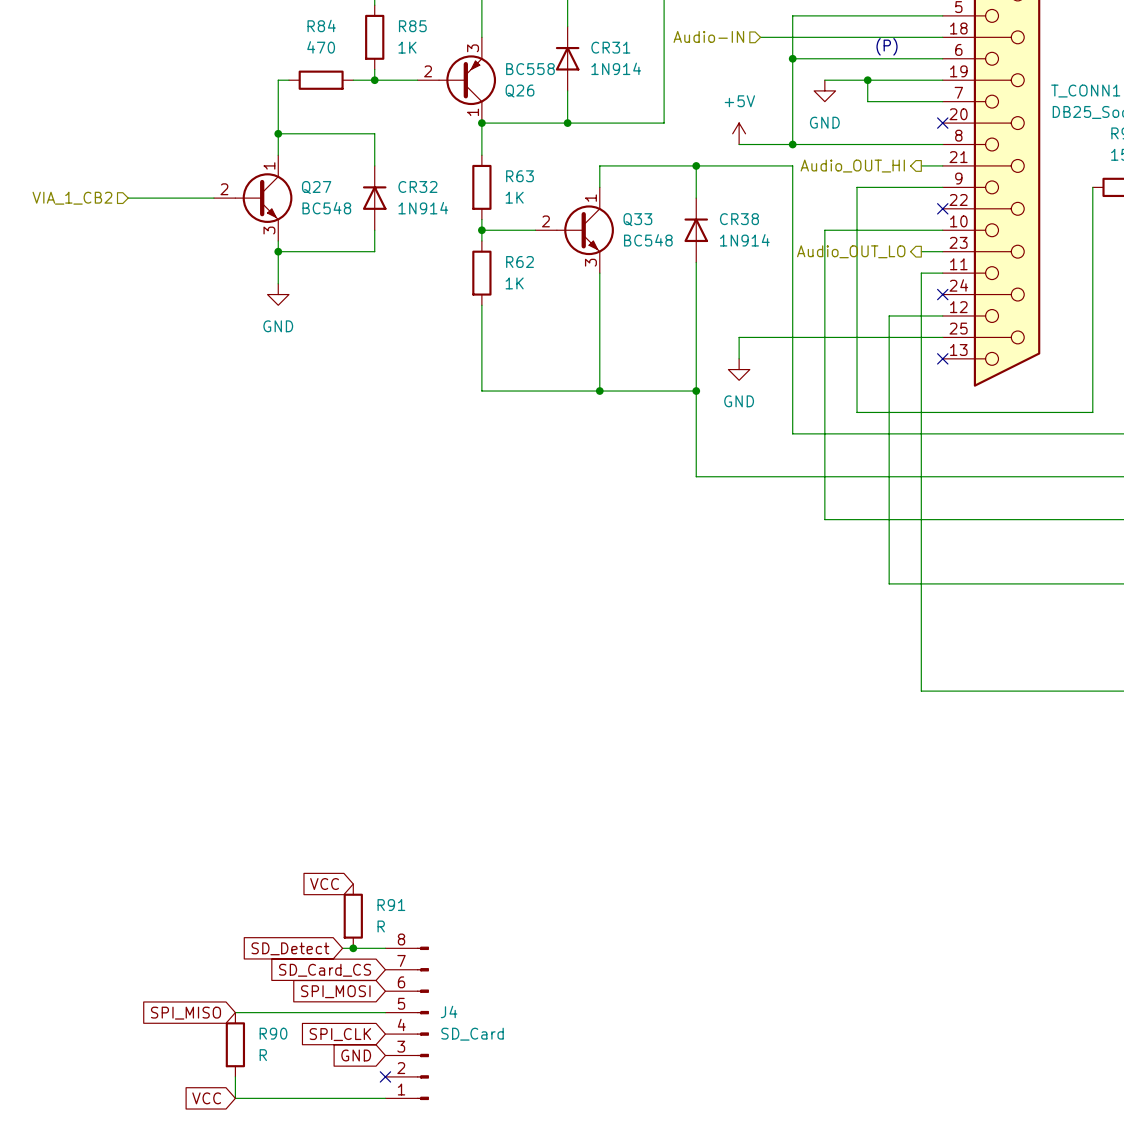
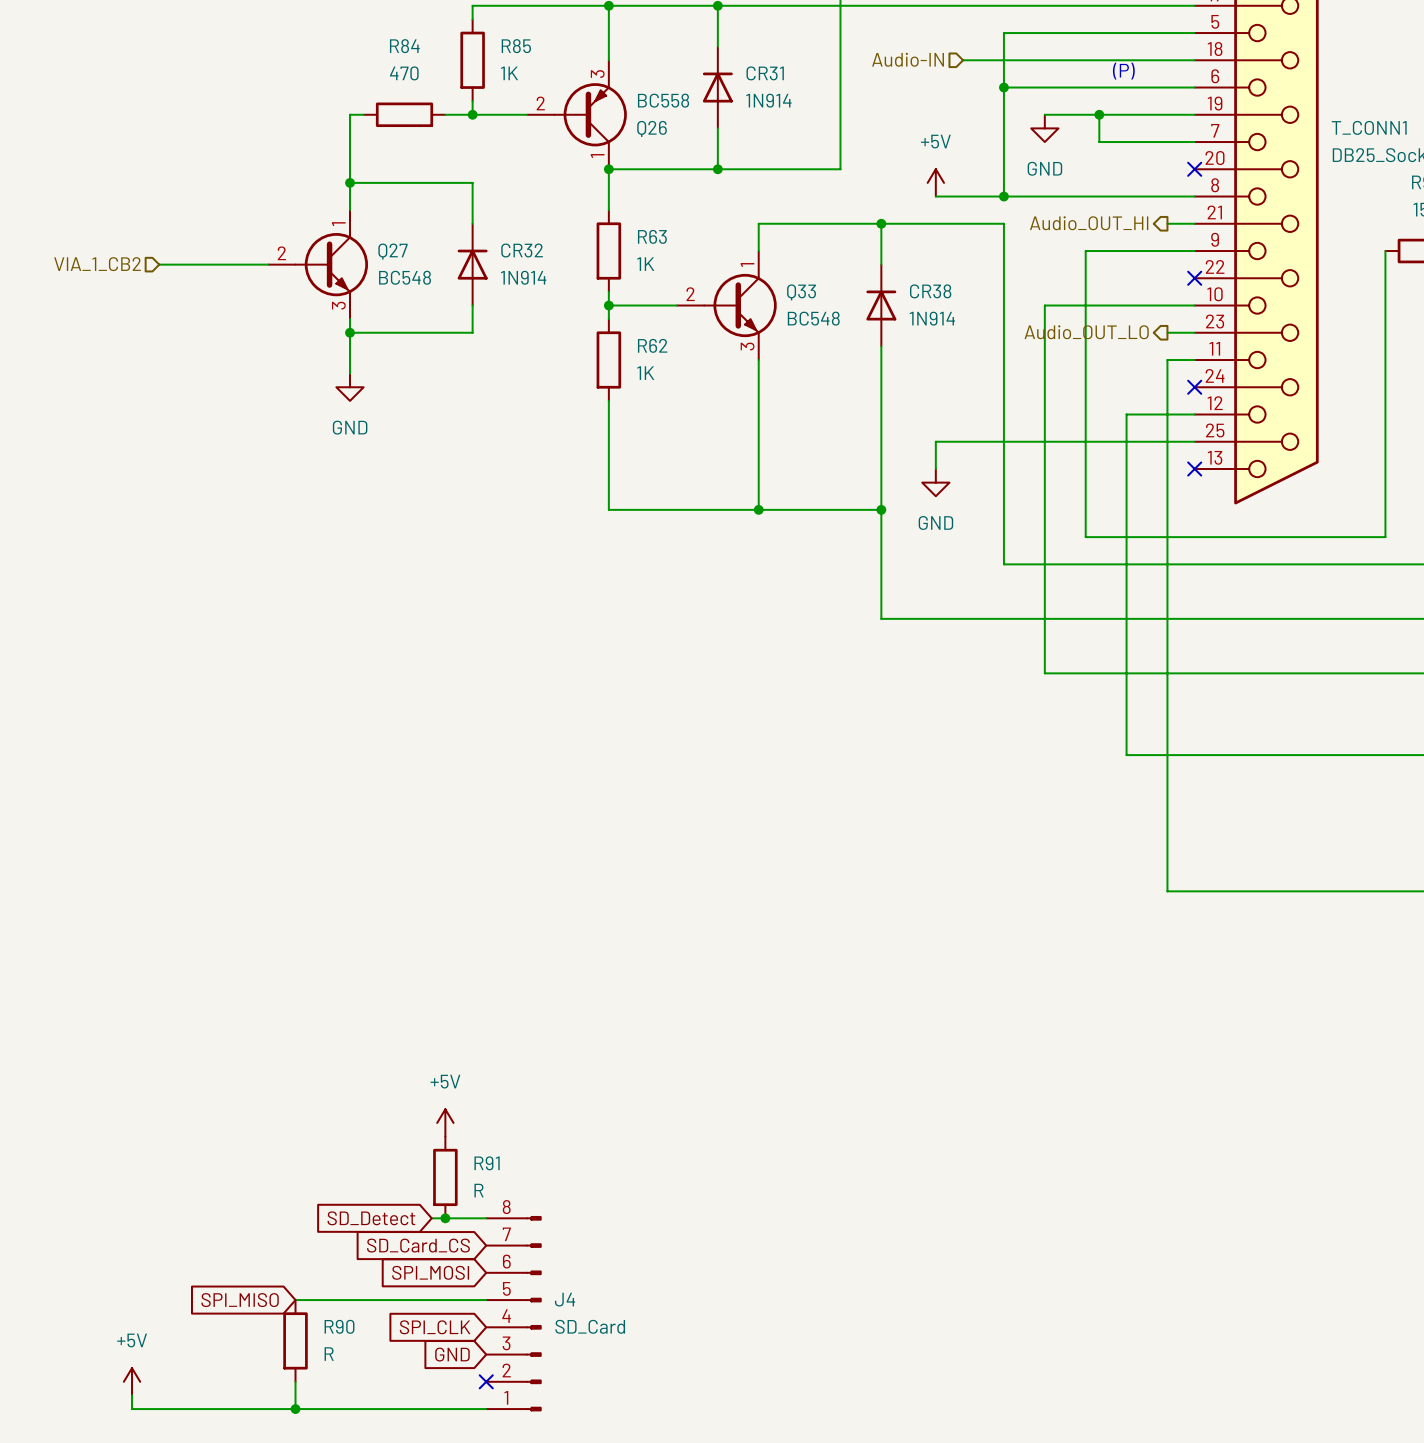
power symbol: none -> +5V (445, 1122)
global label: VCC (324, 884) -> none
power symbol: none -> +5V (132, 1381)
wire: none -> (132, 1395) (132, 1409) (295, 1409)
global label: VCC (206, 1098) -> none
junction: none -> (295, 1409)

